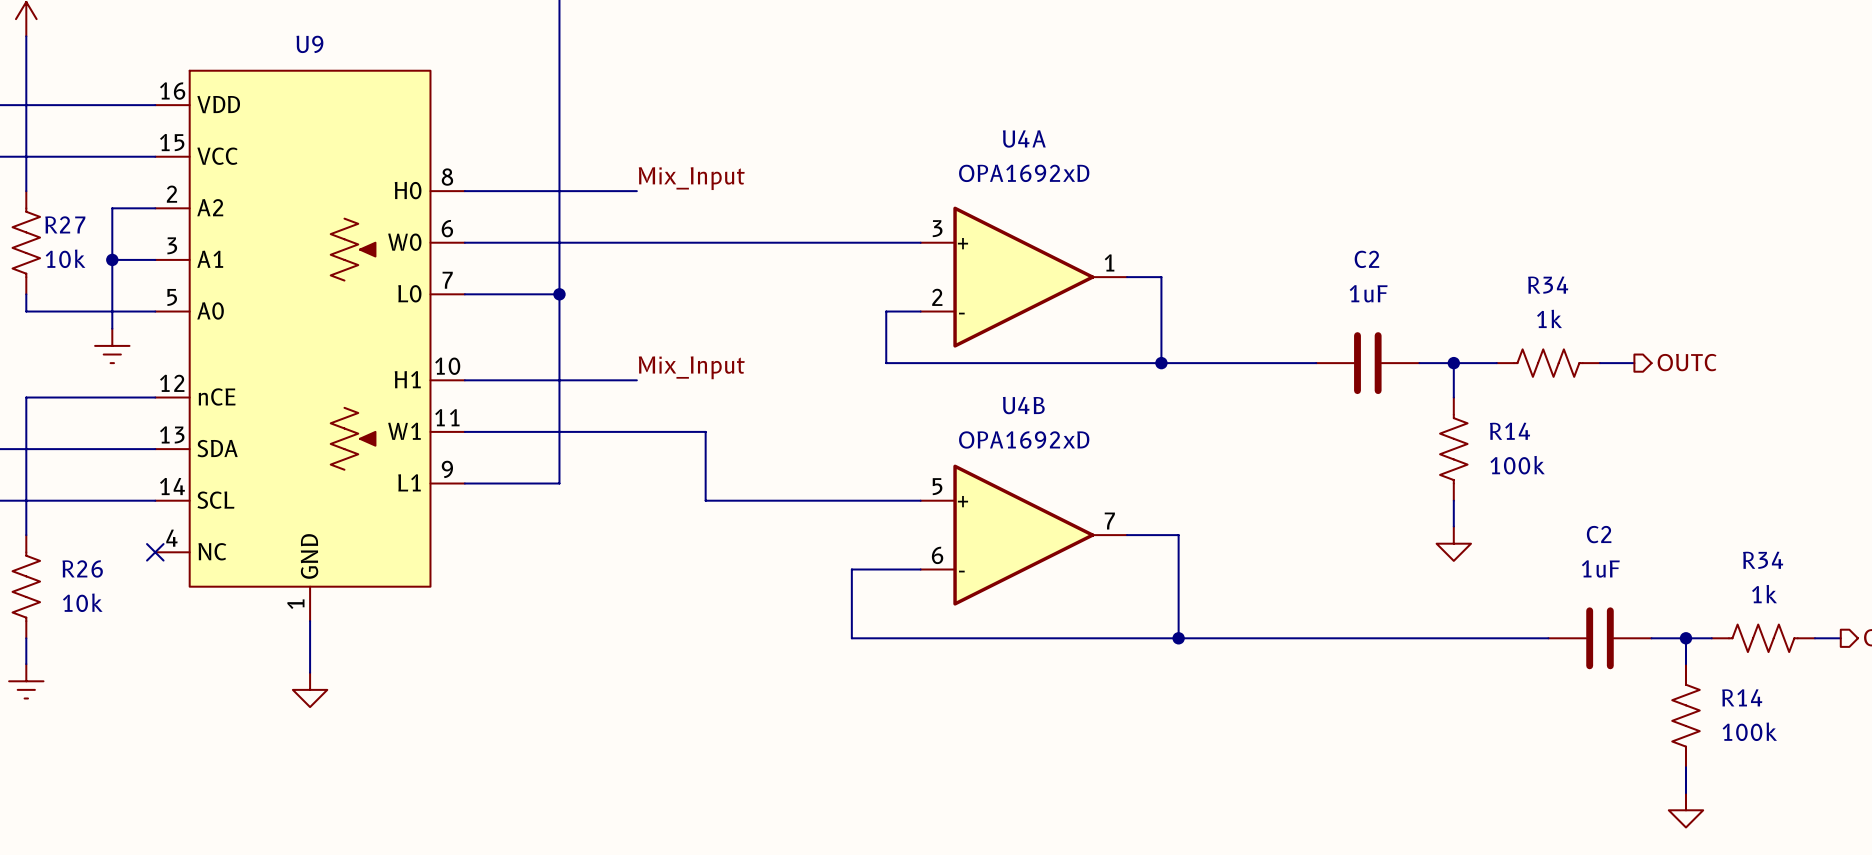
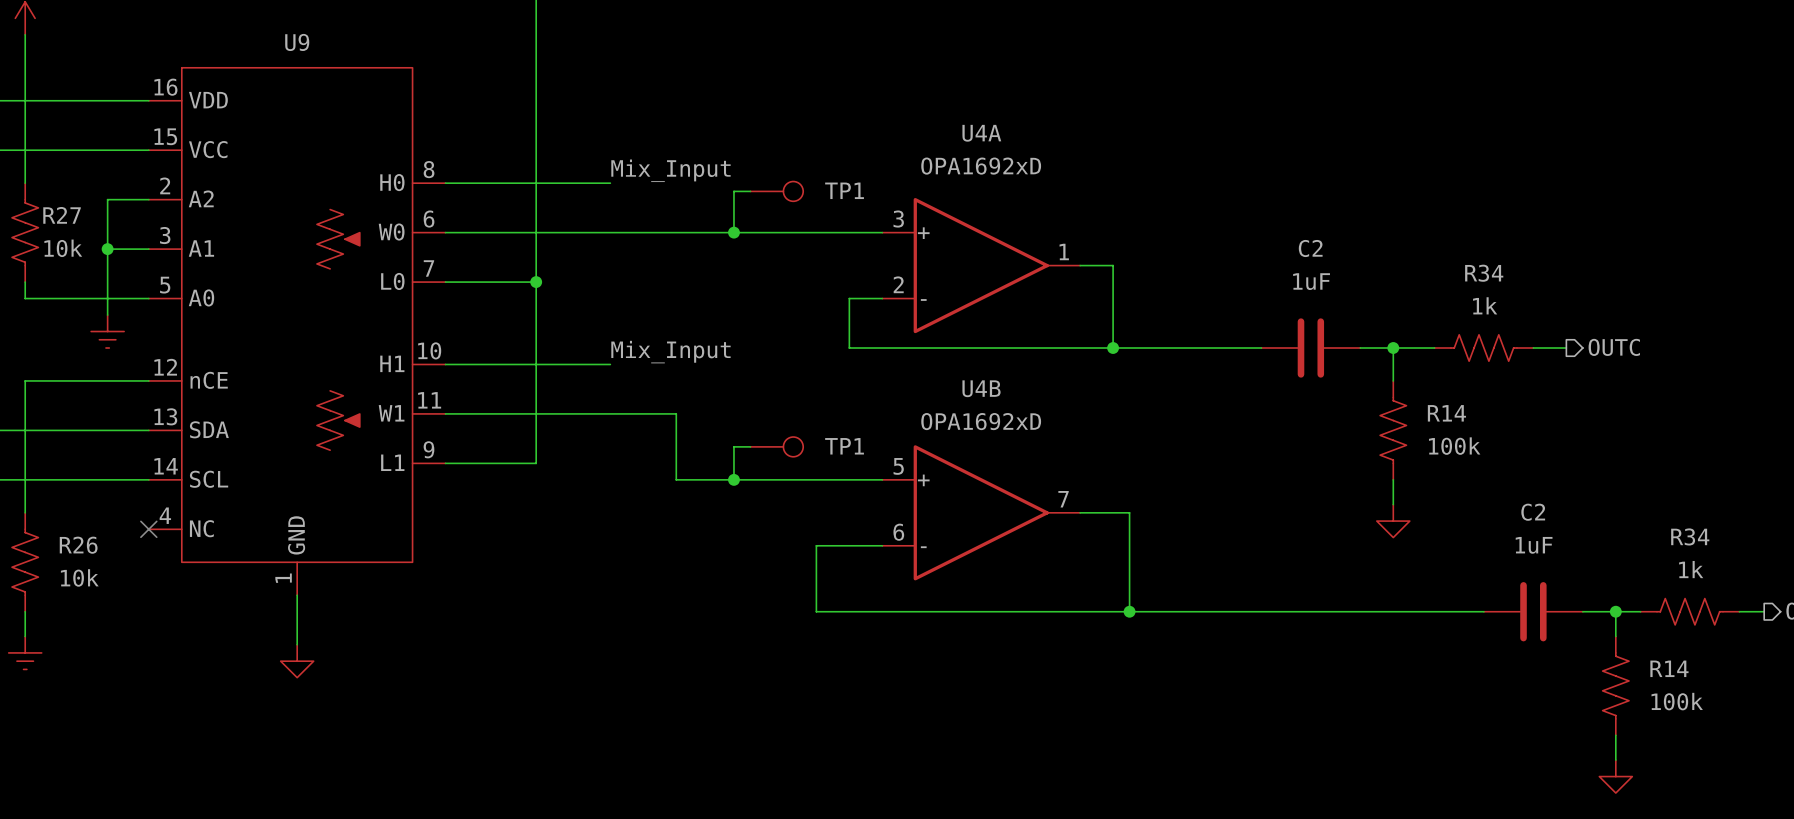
wire: none -> (750, 191) (733, 191) (733, 232)
TP1: none -> (776, 191)
junction: none -> (733, 232)
wire: none -> (750, 446) (733, 446) (733, 479)
TP1: none -> (776, 446)
junction: none -> (733, 479)

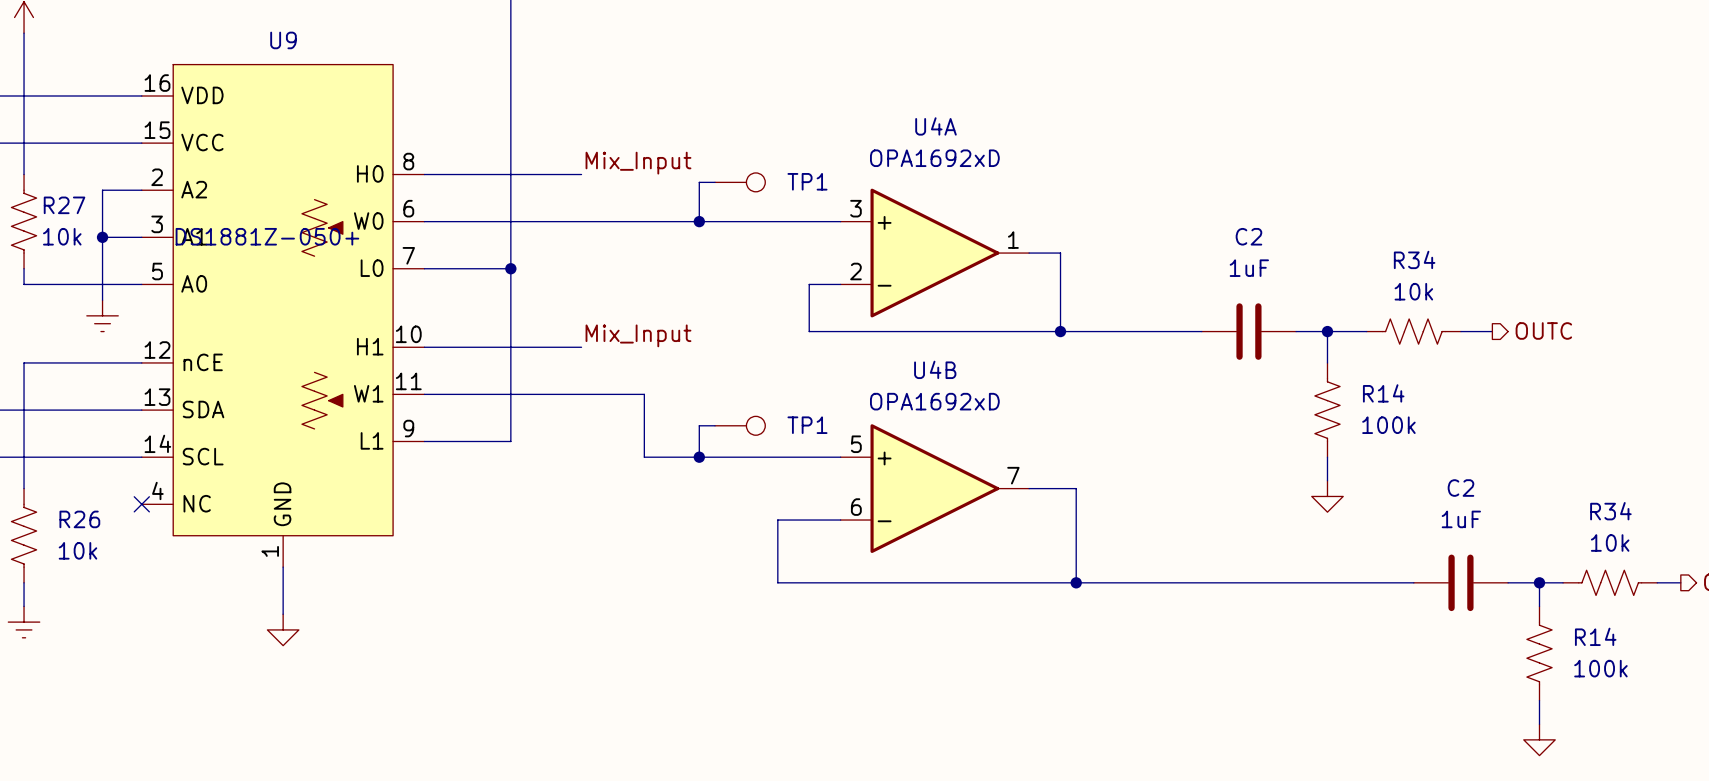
U9 value: none -> DS1881Z-050+ (267, 236)
R34 value: 1k (1485, 305) -> 10k (1413, 291)
R34 value: 1k (1691, 569) -> 10k (1610, 542)

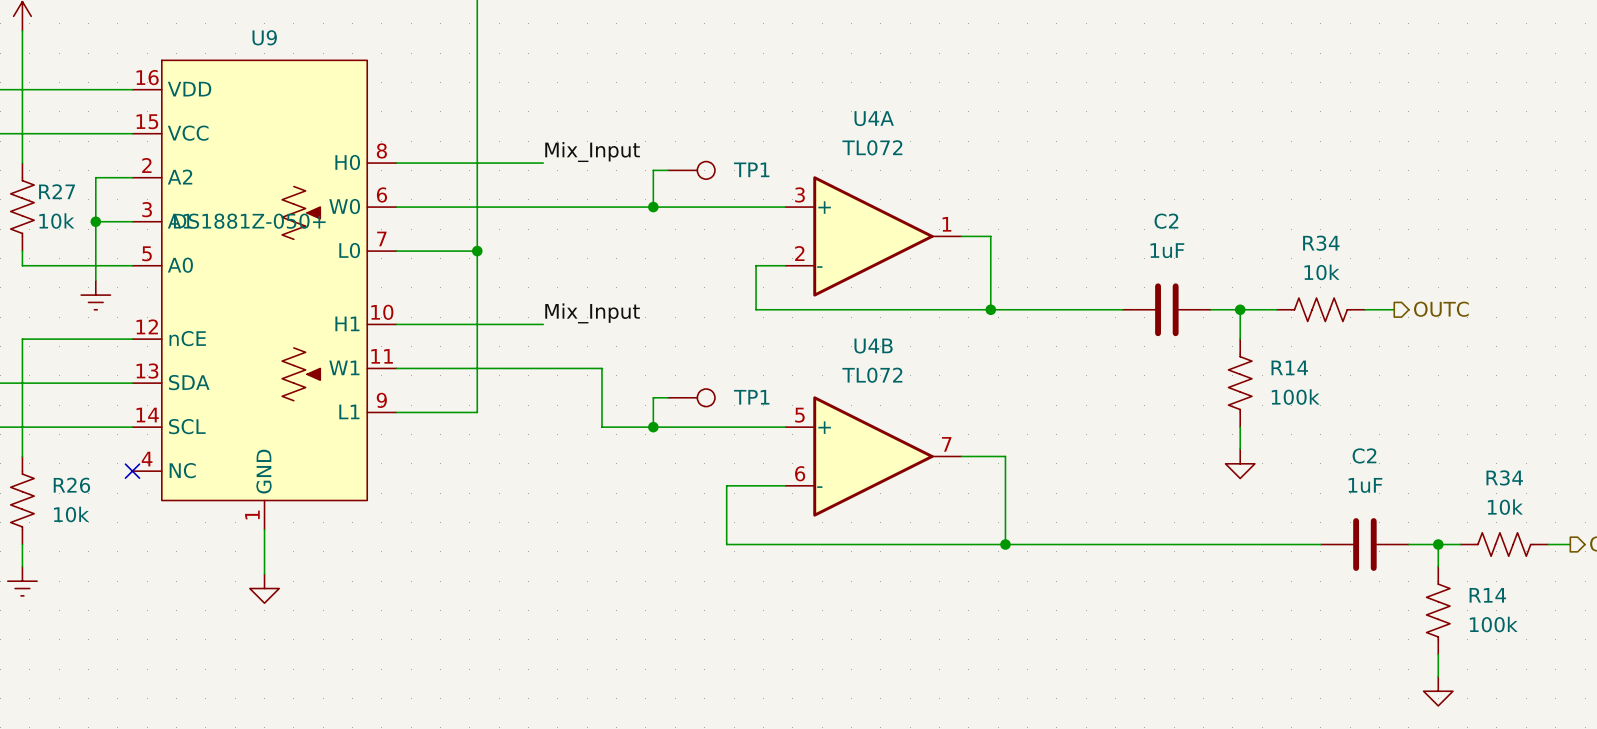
U4A value: OPA1692xD (934, 158) -> TL072 (872, 147)
U4B value: OPA1692xD (934, 401) -> TL072 (872, 375)

